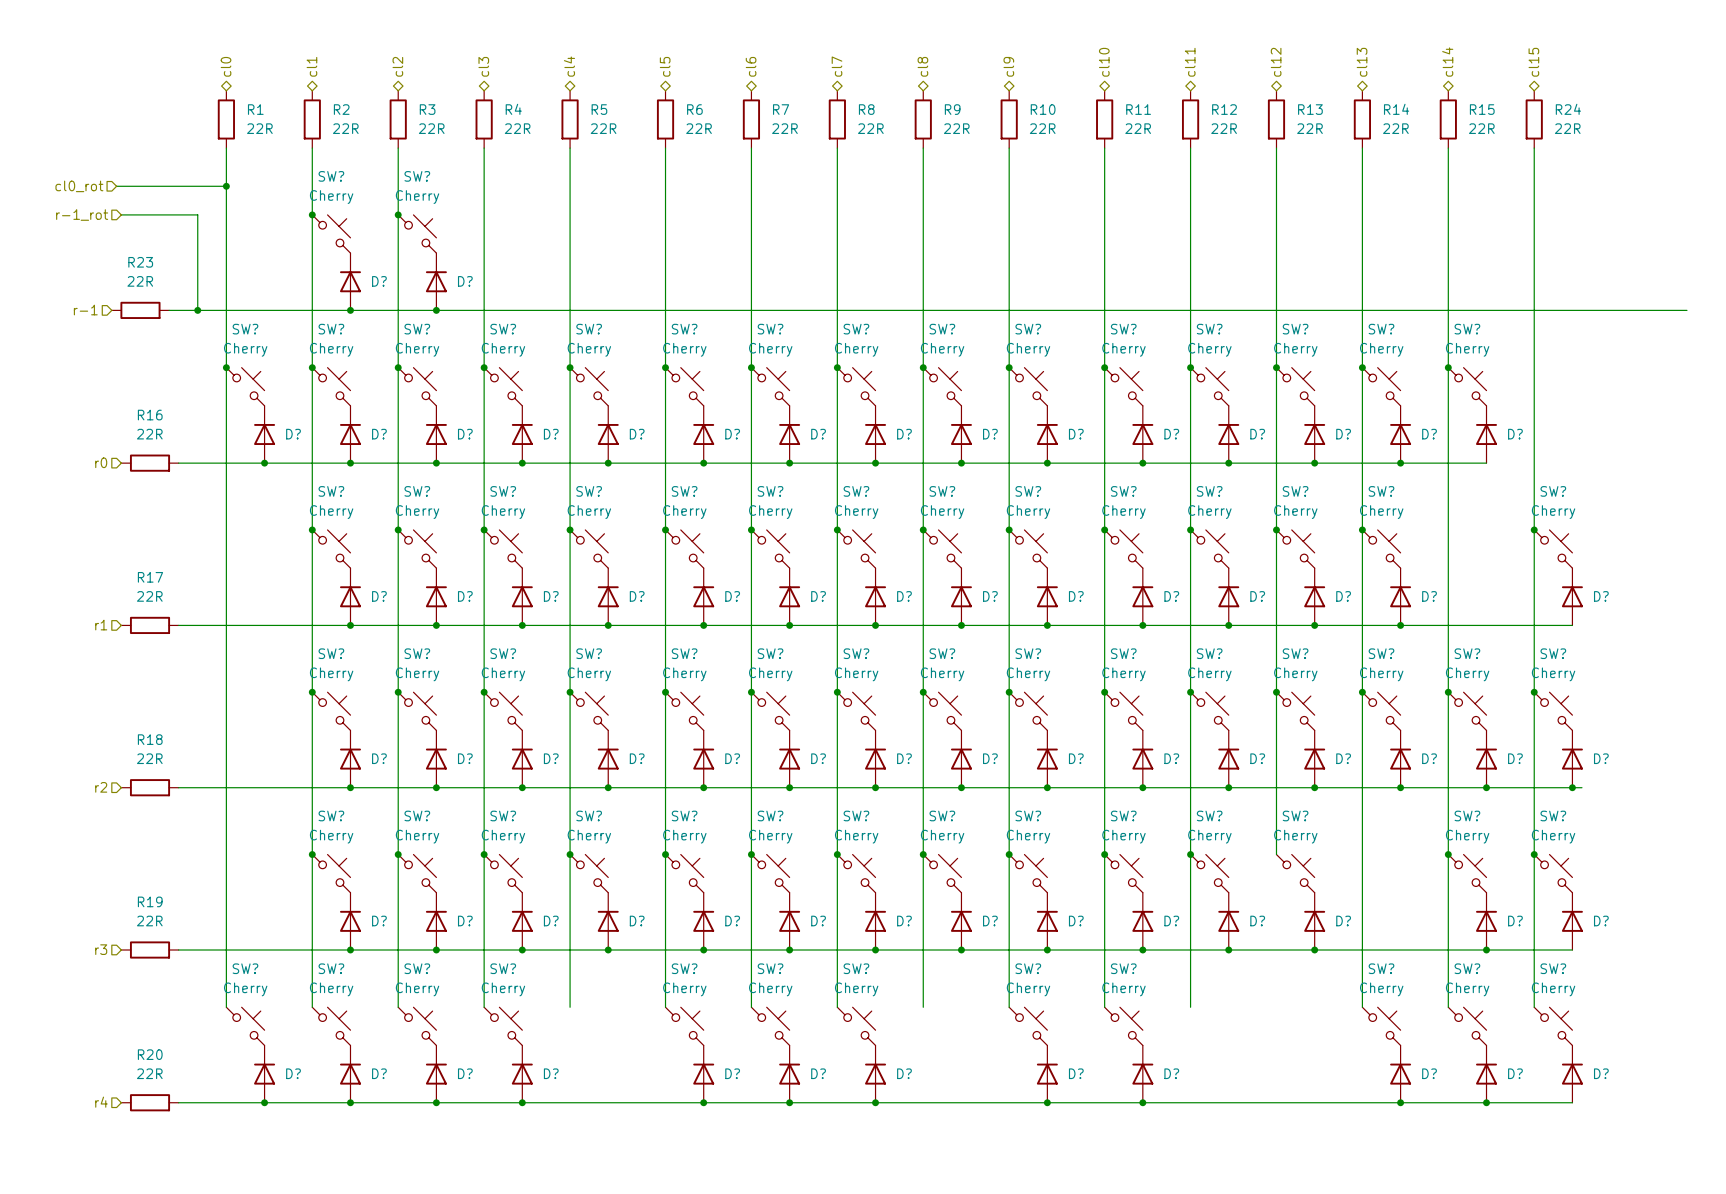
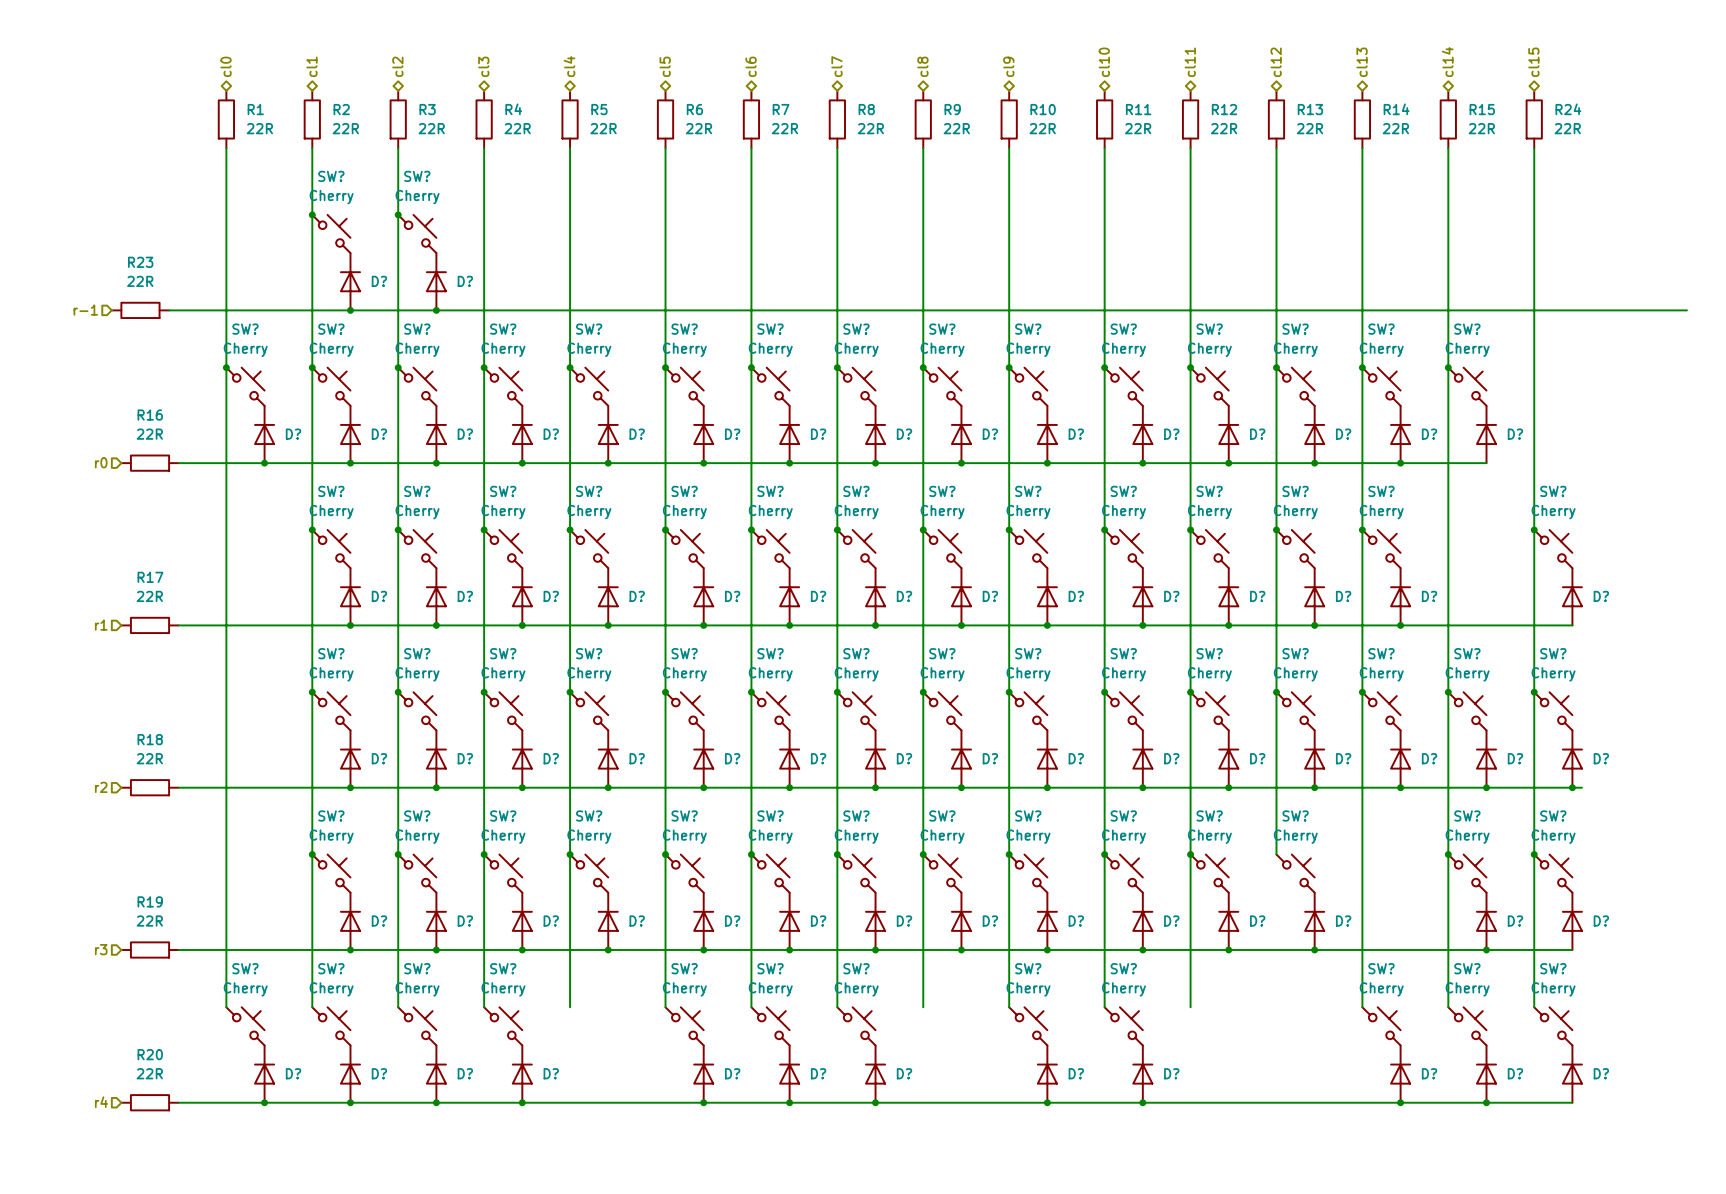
hierarchical label: cl0_rot (79, 186) -> none
wire: (116, 186) (226, 186) -> none
junction: (226, 186) -> none
wire: (121, 214) (197, 214) (197, 310) -> none
hierarchical label: r-1_rot (82, 215) -> none
junction: (197, 310) -> none

